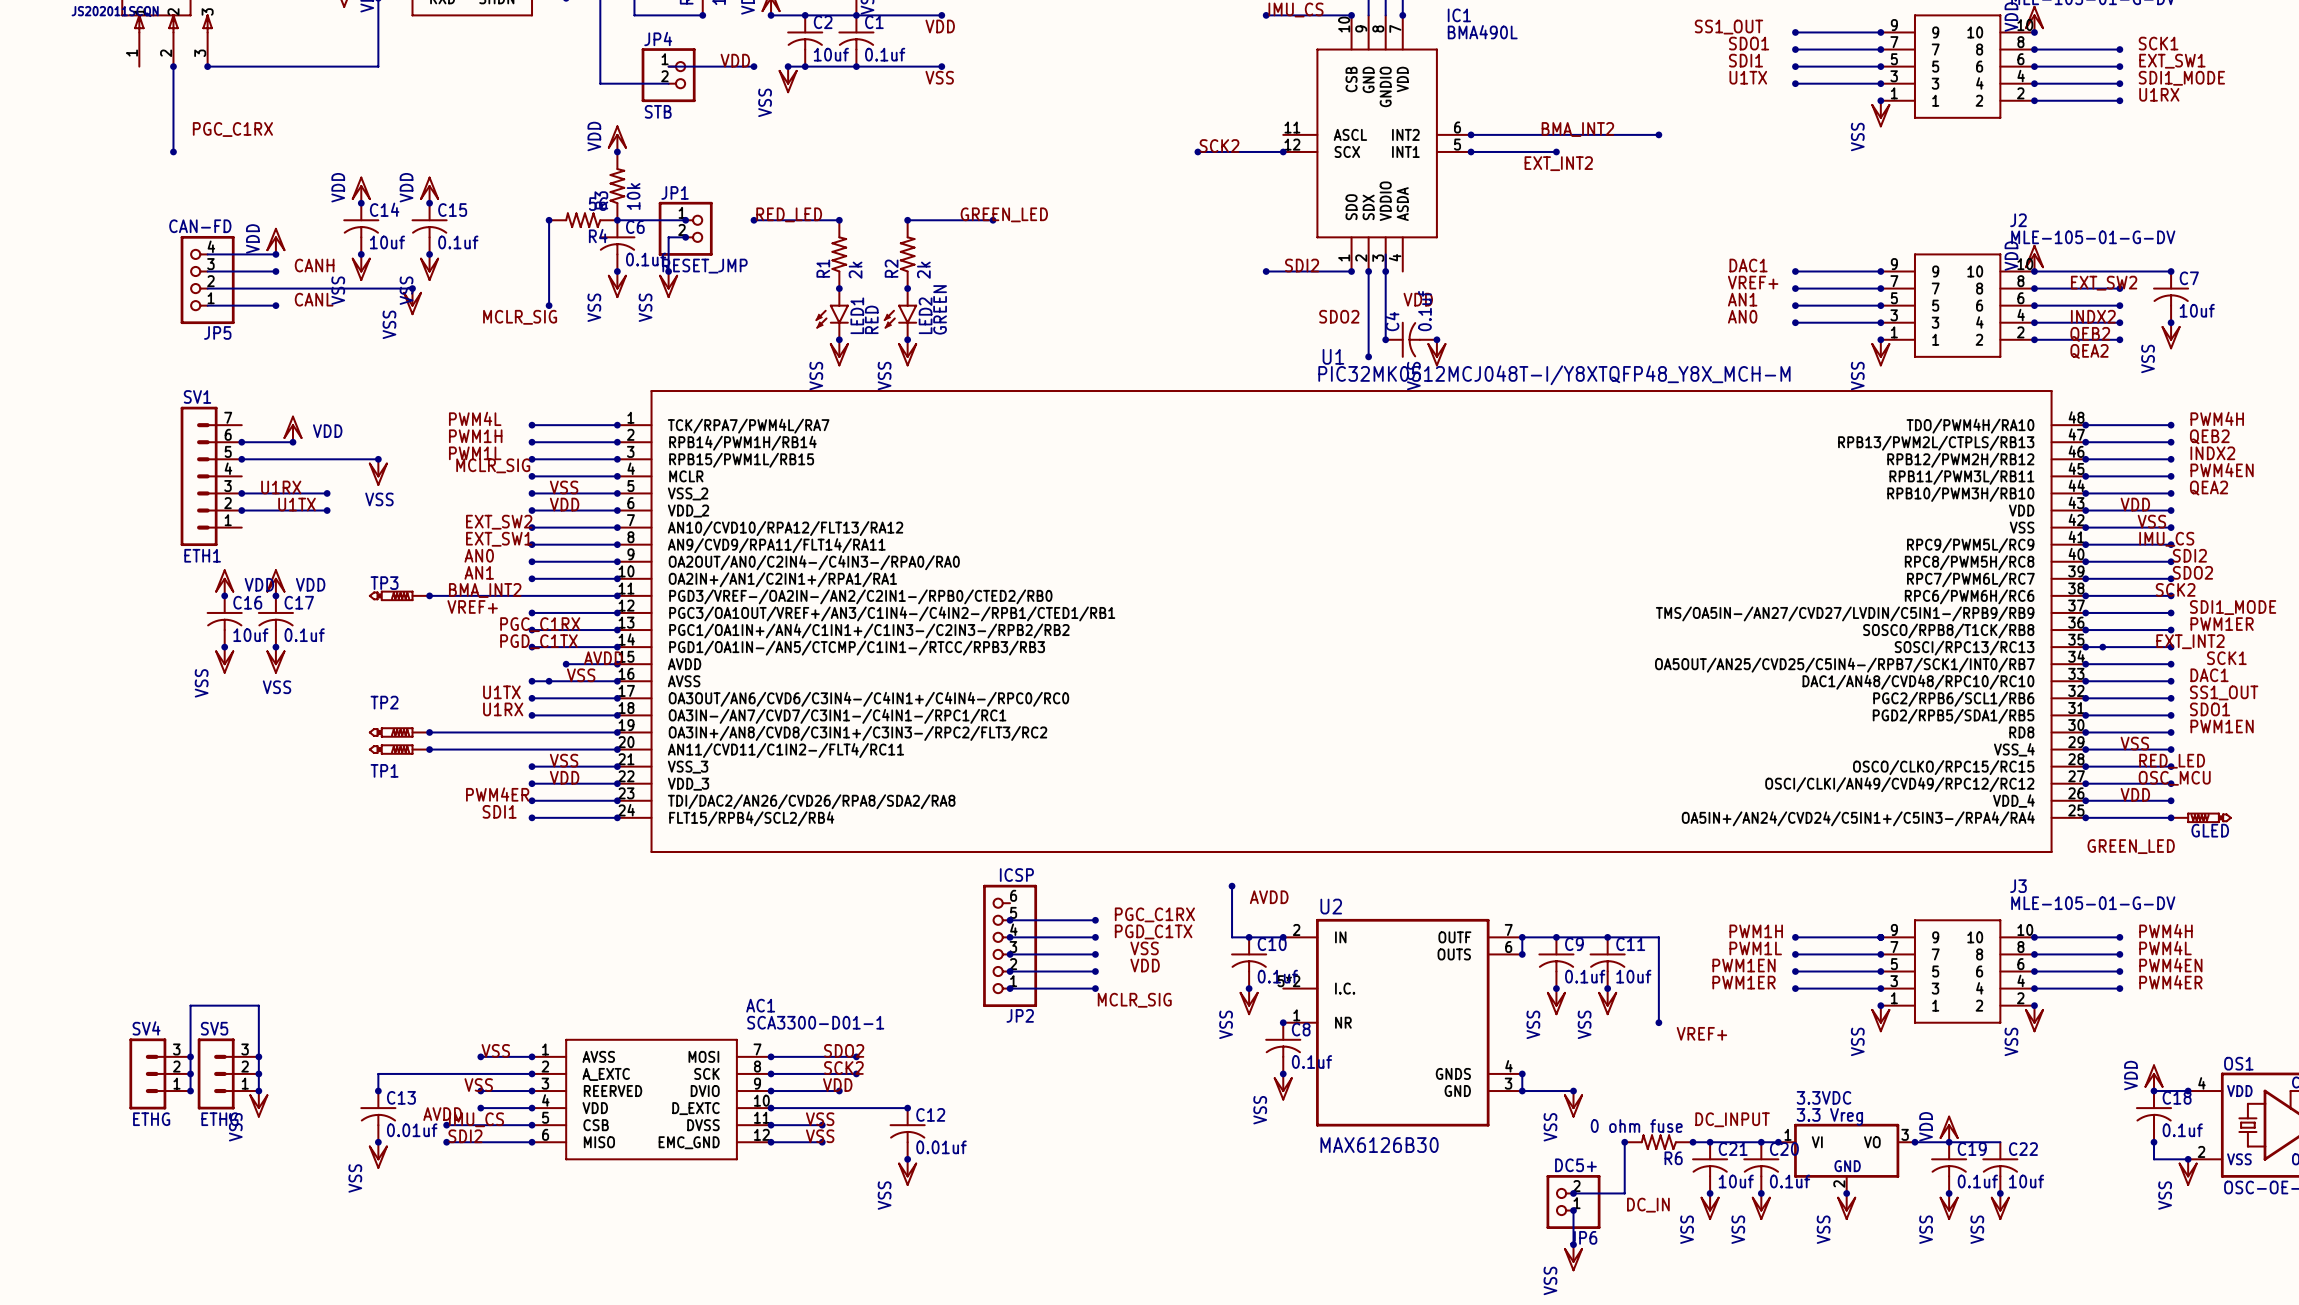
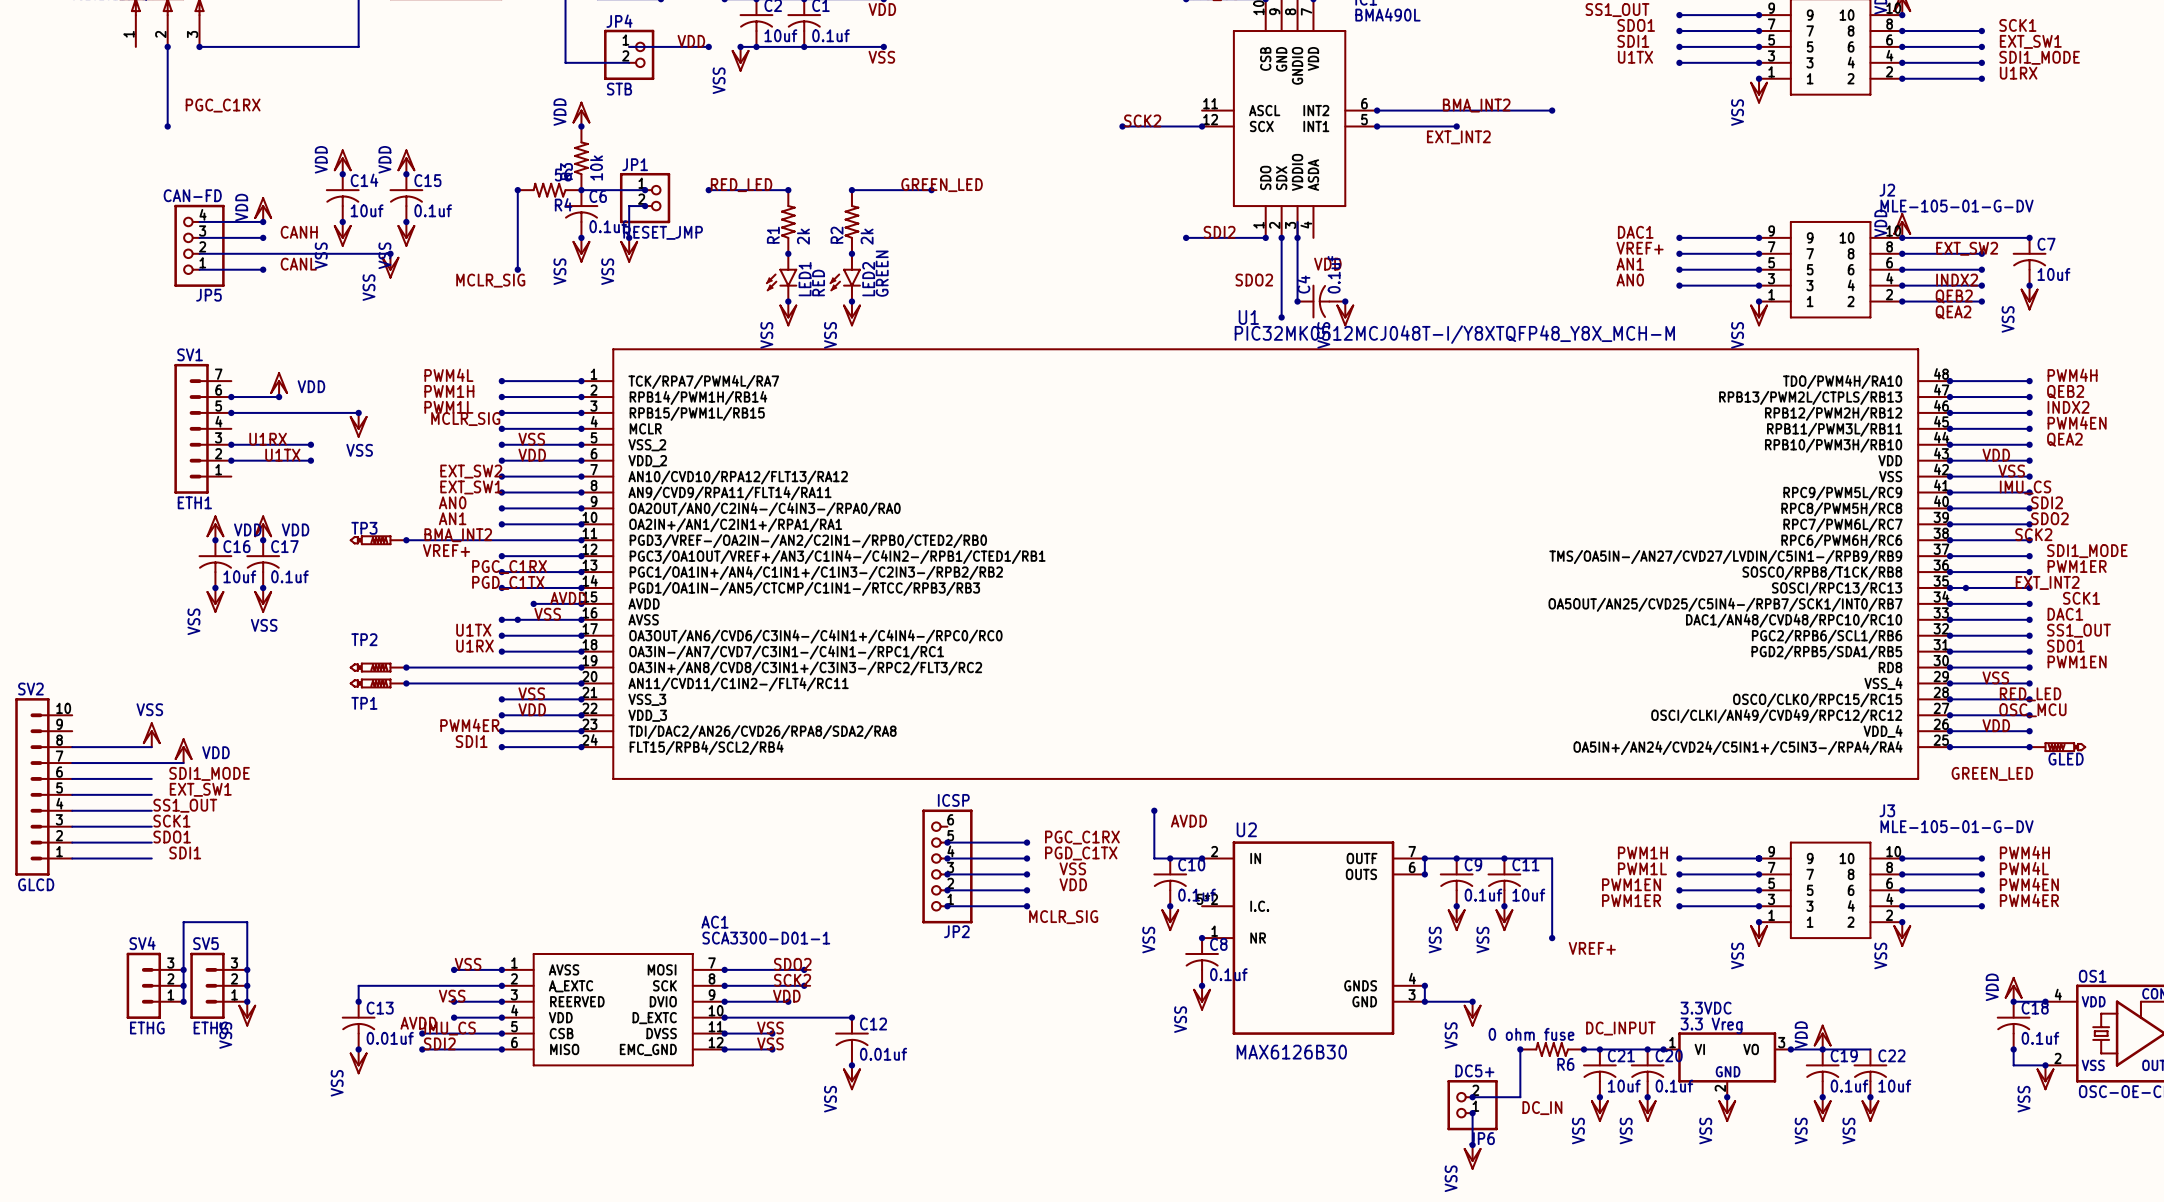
power symbol: none -> VSS (151, 734)
wire: none -> (72, 747) (151, 747)
power symbol: none -> VDD (183, 750)
wire: none -> (72, 763) (183, 763)
label: none -> SDI1_MODE (209, 773)
wire: none -> (72, 778) (151, 778)
SV2: none -> GLCD (43, 786)
label: none -> EXT_SW1 (200, 789)
wire: none -> (72, 794) (151, 794)
label: none -> SS1_OUT (185, 805)
wire: none -> (72, 810) (151, 810)
label: none -> SCK1 (171, 821)
wire: none -> (72, 826) (151, 826)
label: none -> SDO1 (172, 837)
wire: none -> (72, 842) (151, 842)
label: none -> SDI1 (185, 852)
wire: none -> (72, 858) (151, 858)

